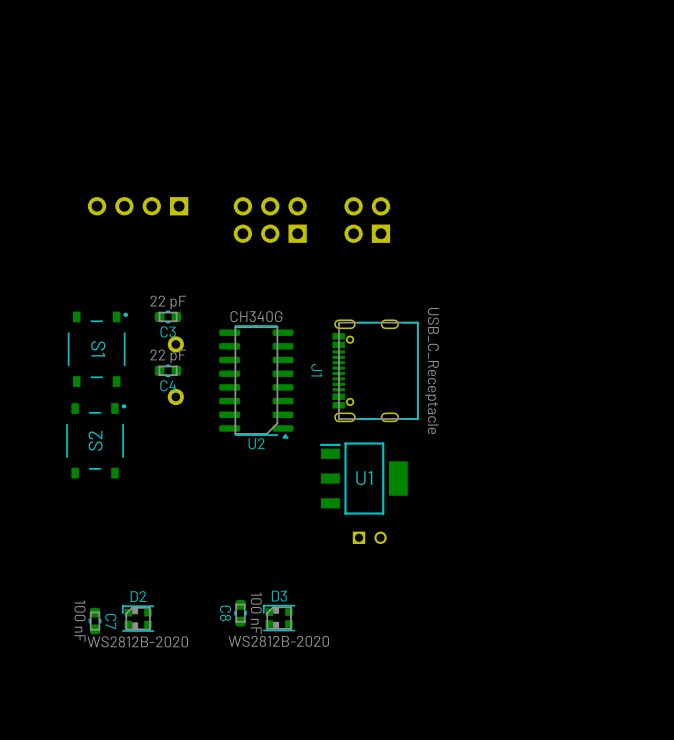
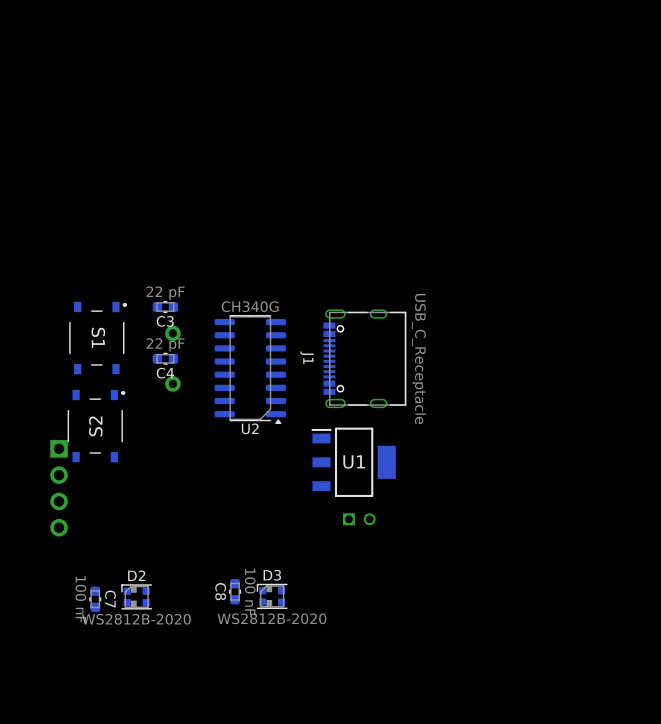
part: (138, 206) -> none
part: (270, 220) -> none
part: (367, 220) -> none
part: none -> (59, 488)

